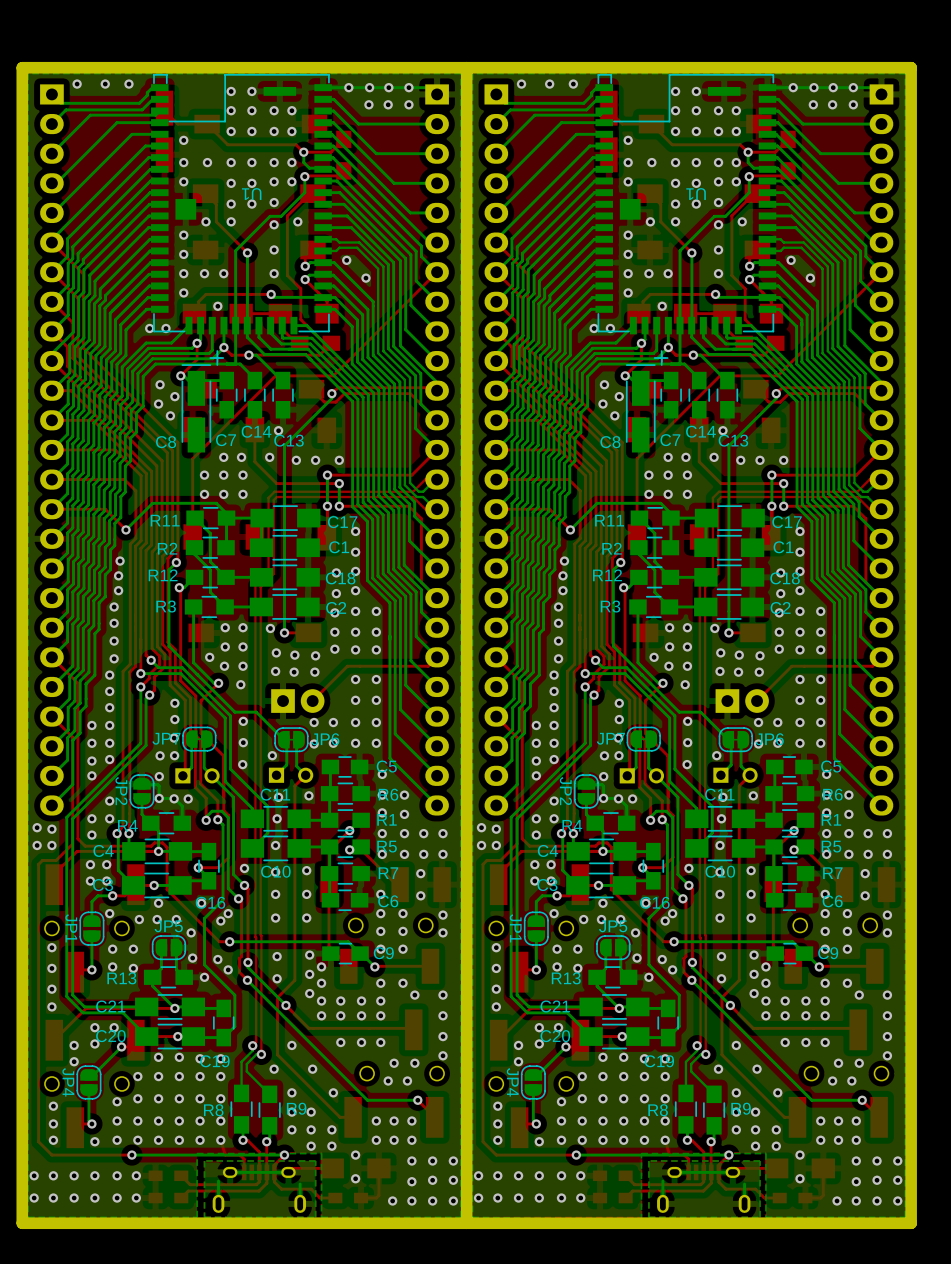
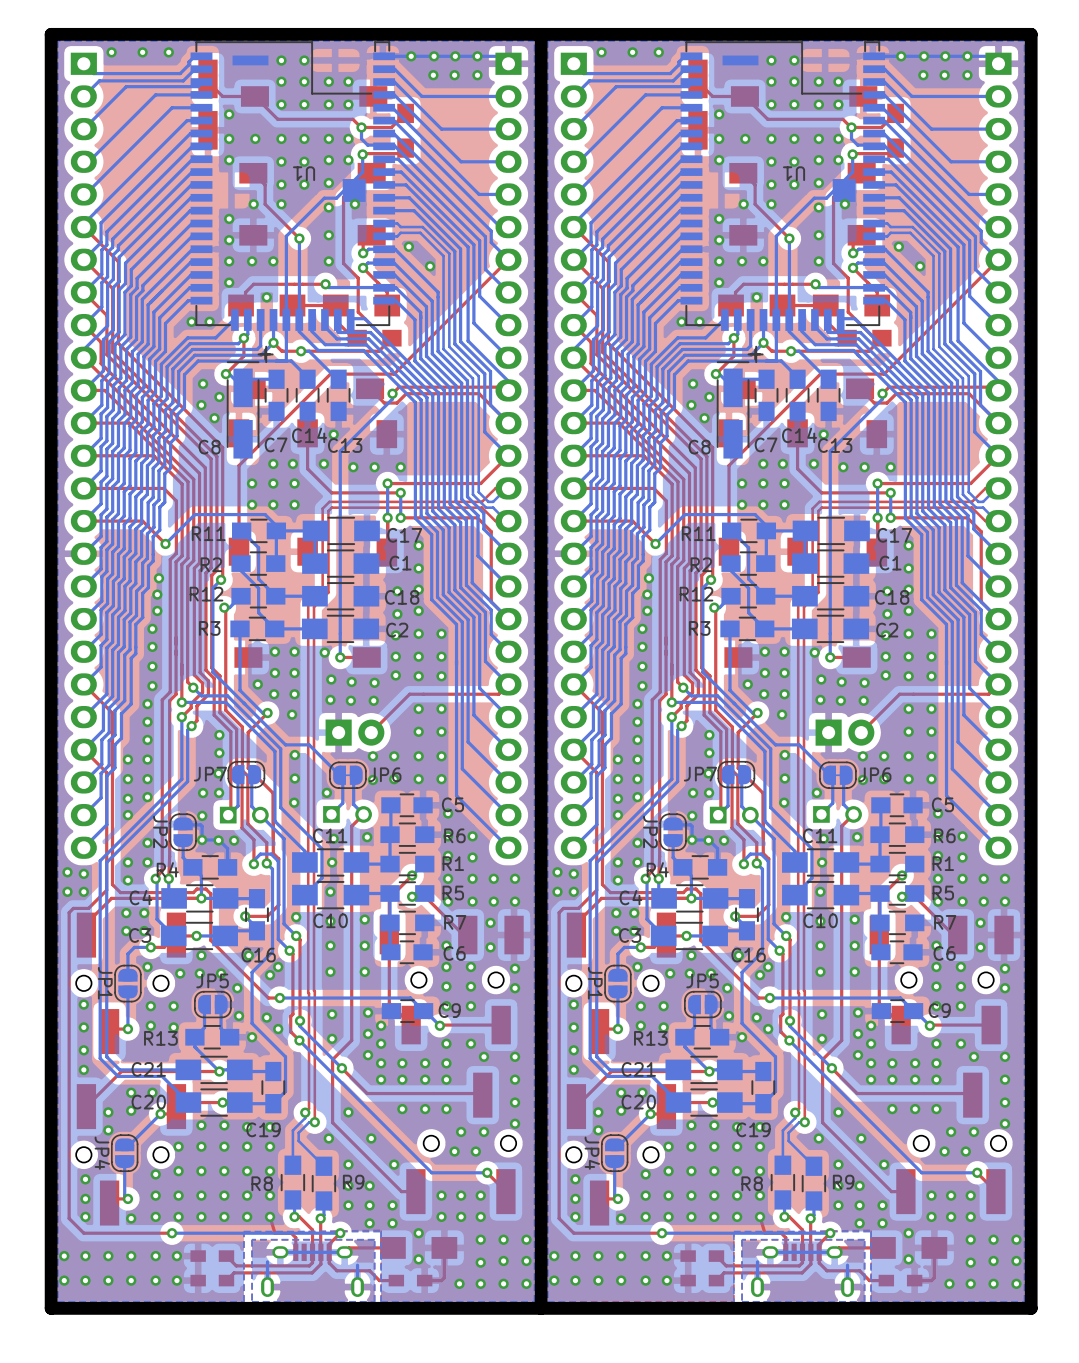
U1 footprint: [151, 73, 332, 335] -> [190, 41, 396, 331]
U1 footprint: [595, 73, 777, 335] -> [680, 41, 886, 331]

